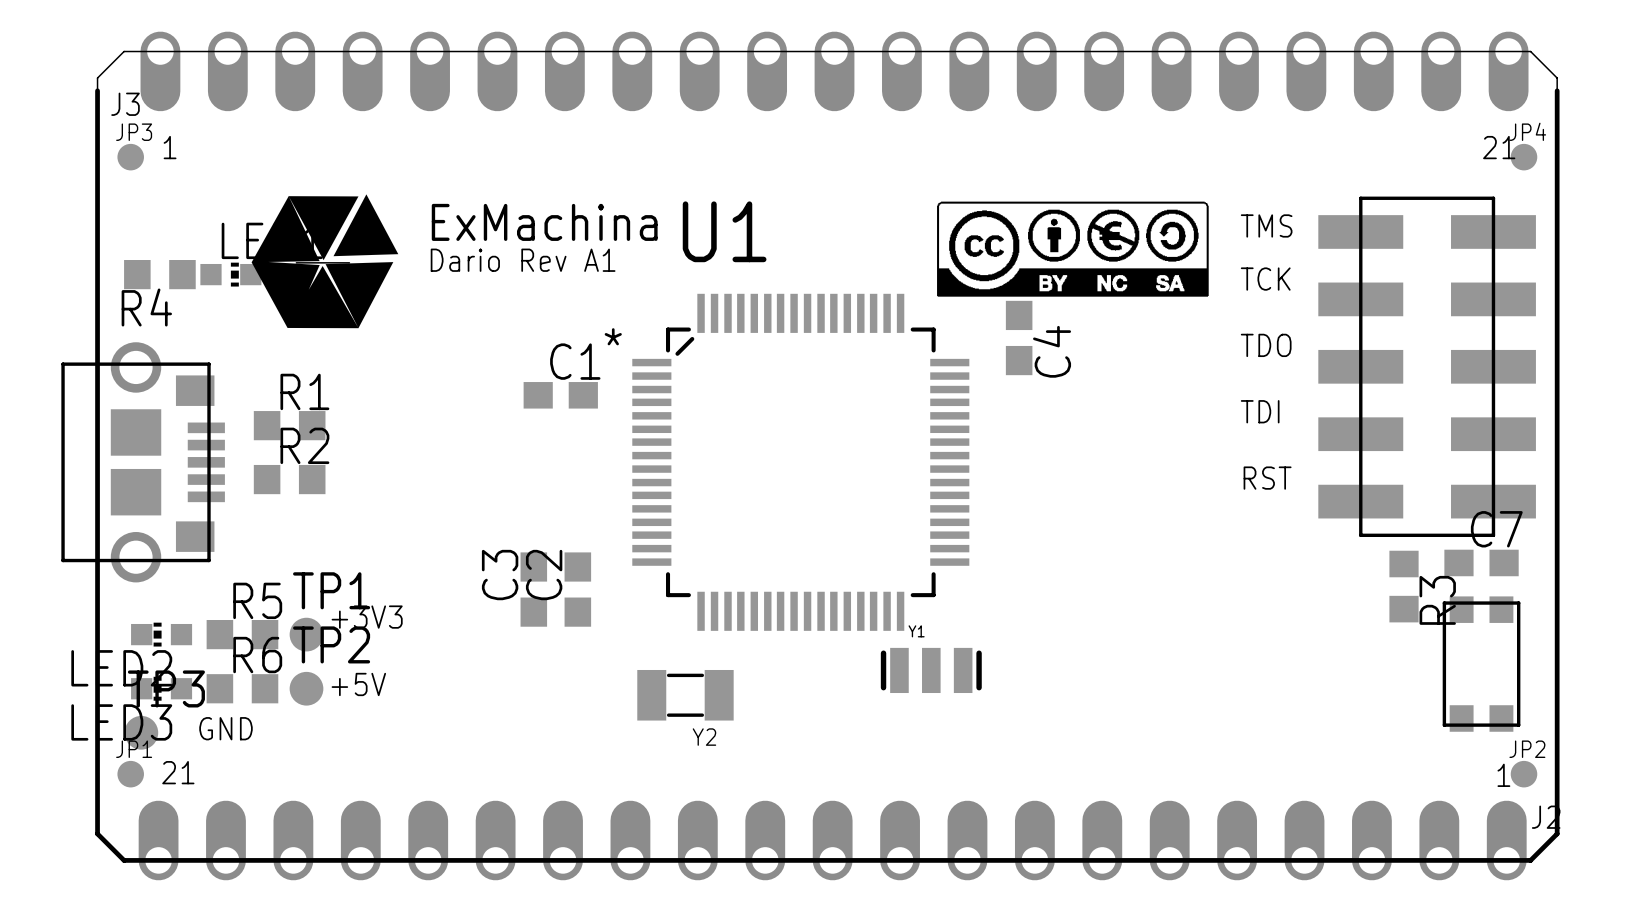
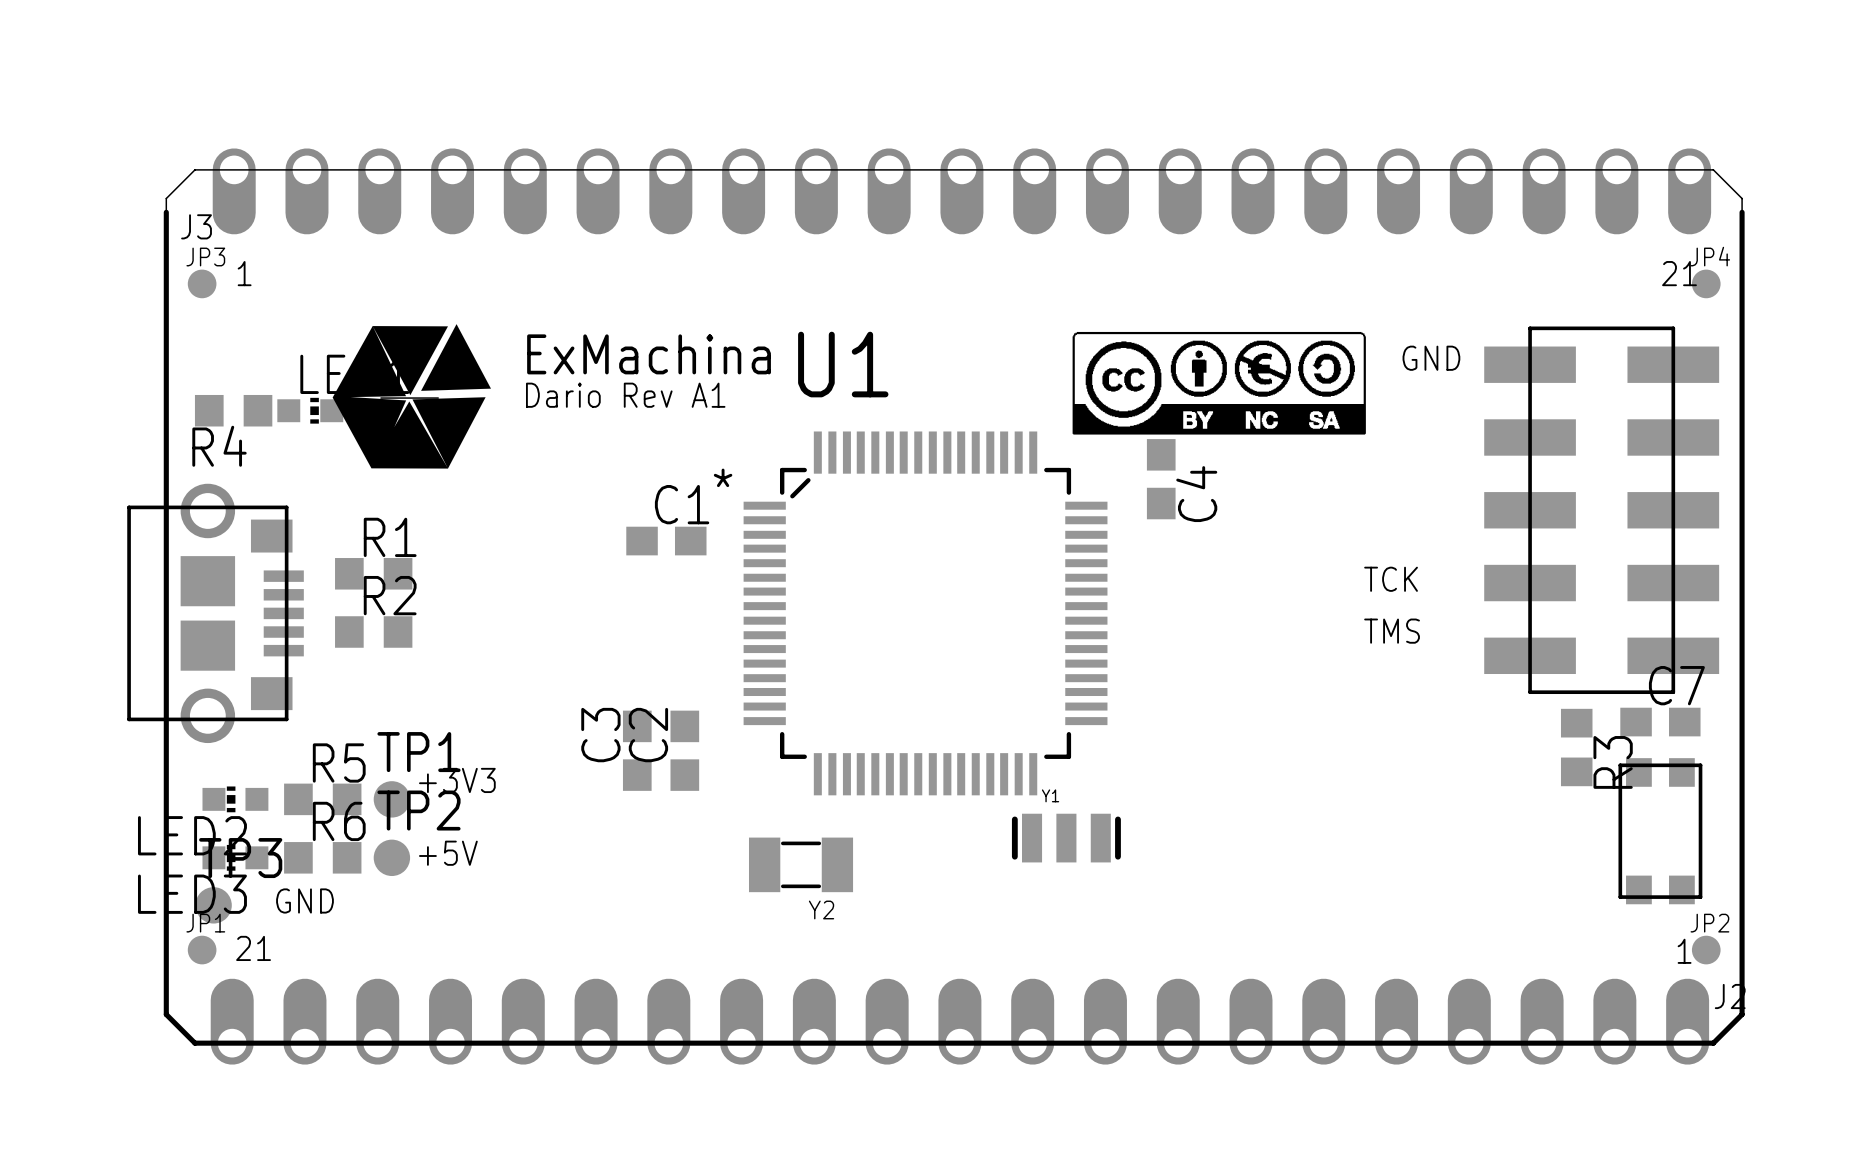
text: TMS (1266, 225) -> GND (1431, 358)
text position: TCK (1265, 279) -> TCK (1391, 579)
text: TDO (1266, 345) -> none
text: TDI (1260, 411) -> none
text: none -> TMS (1392, 631)
text: RST (1267, 478) -> none

